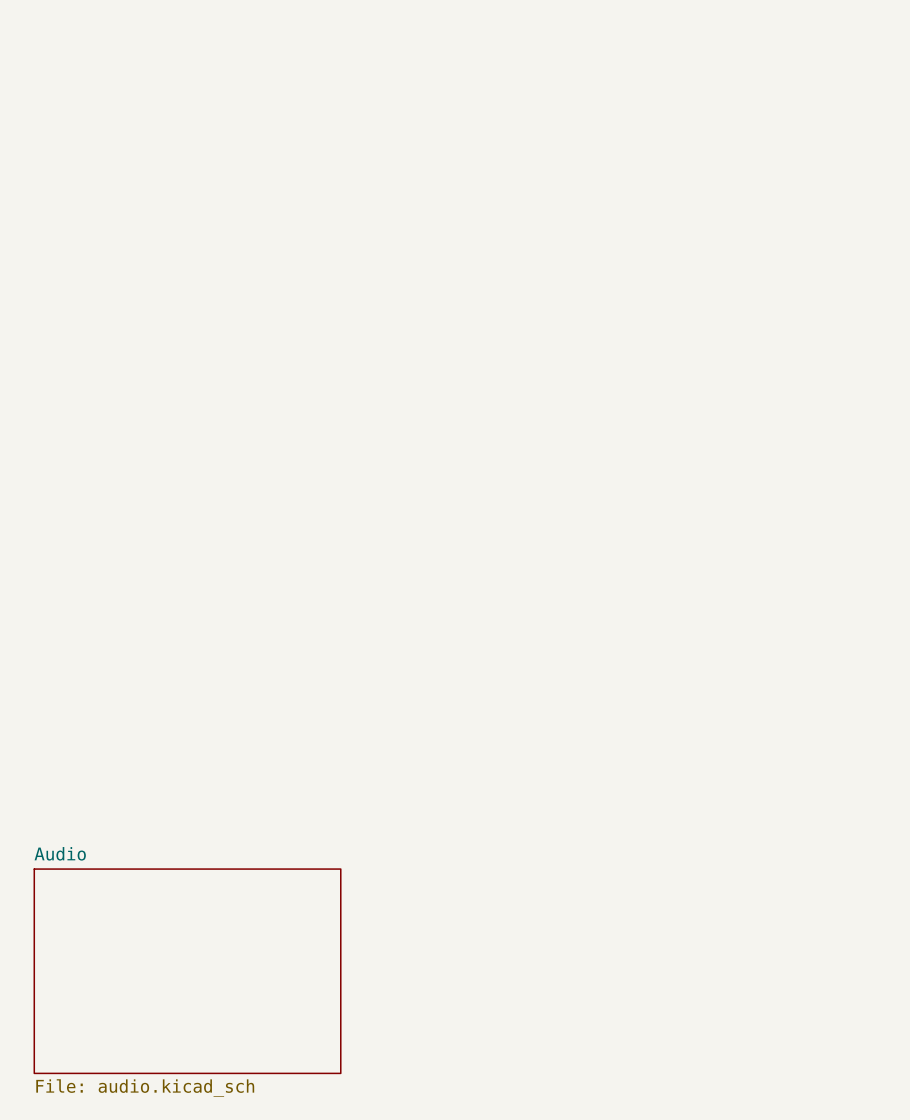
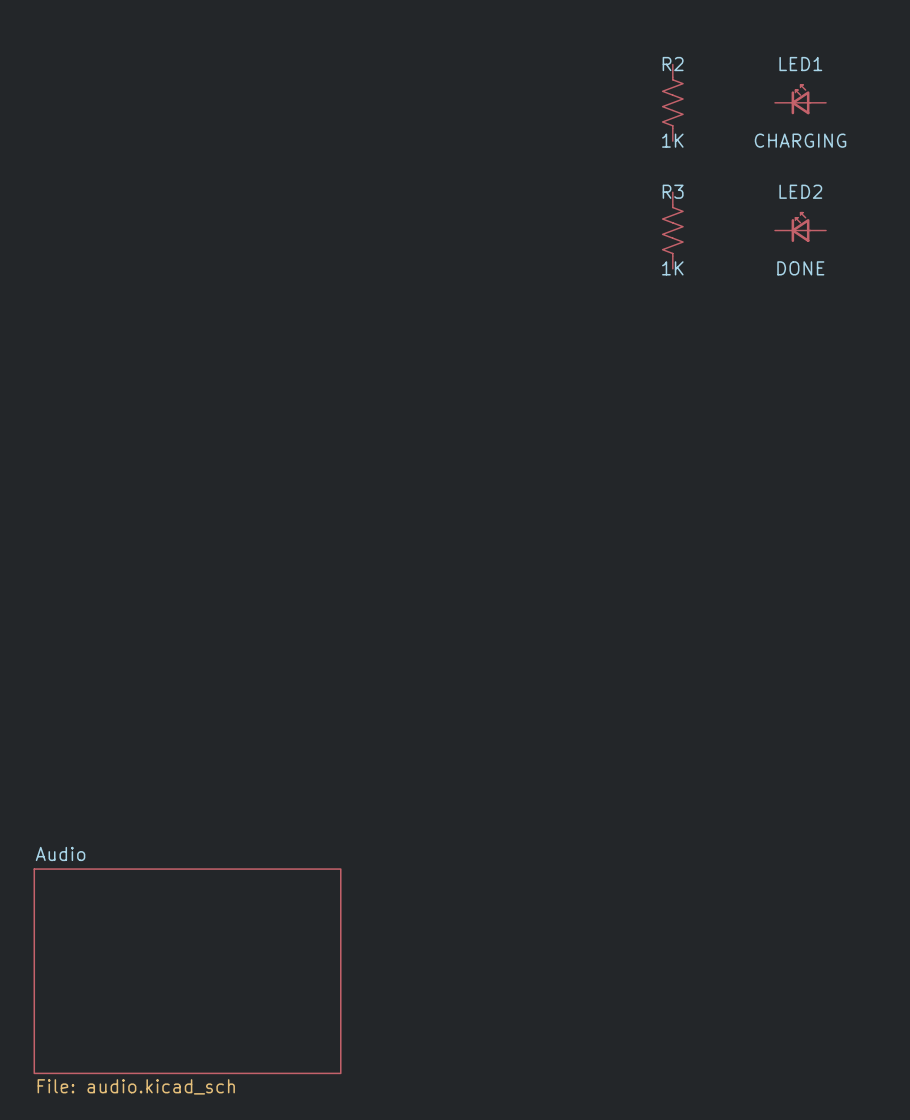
LED1: none -> CHARGING (800, 99)
R2: none -> 1K (672, 102)
LED2: none -> DONE (800, 227)
R3: none -> 1K (672, 230)

